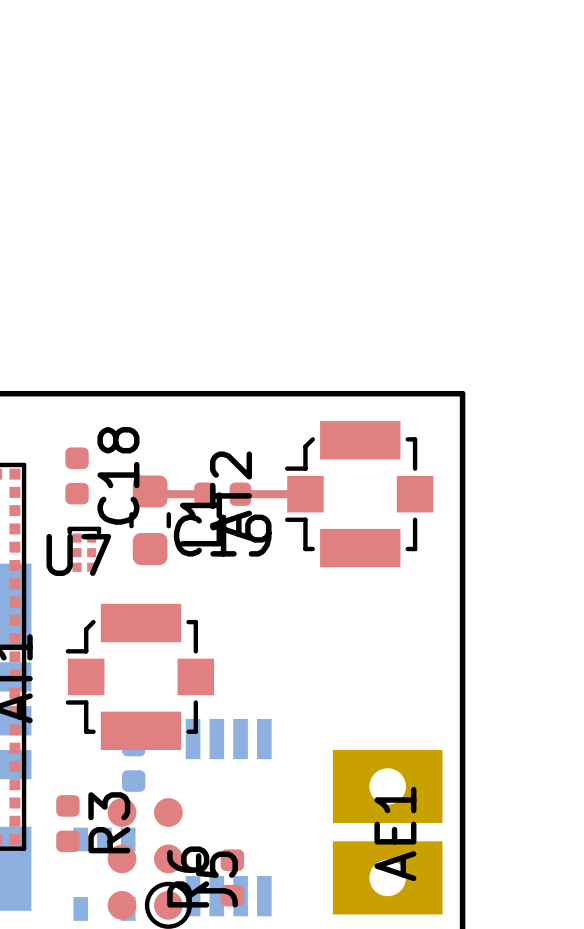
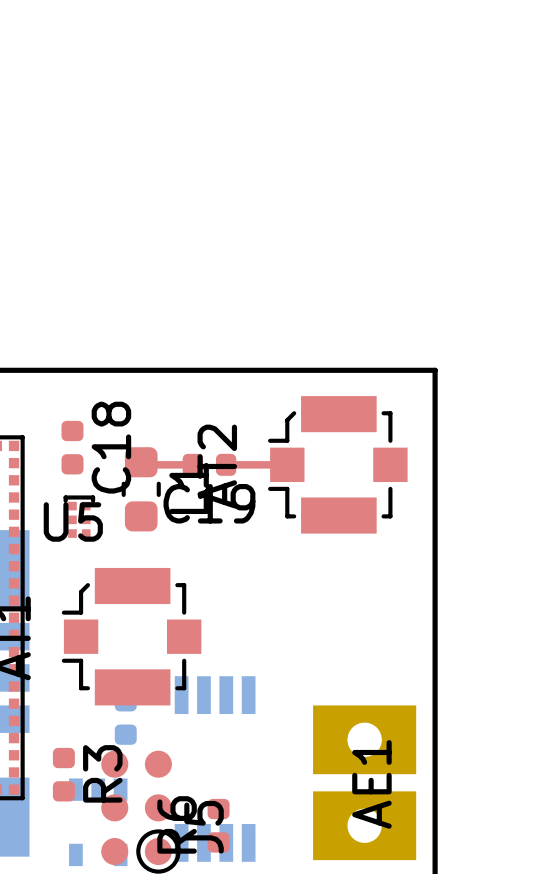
U7 name: U7 (78, 554) -> U5 (73, 521)

